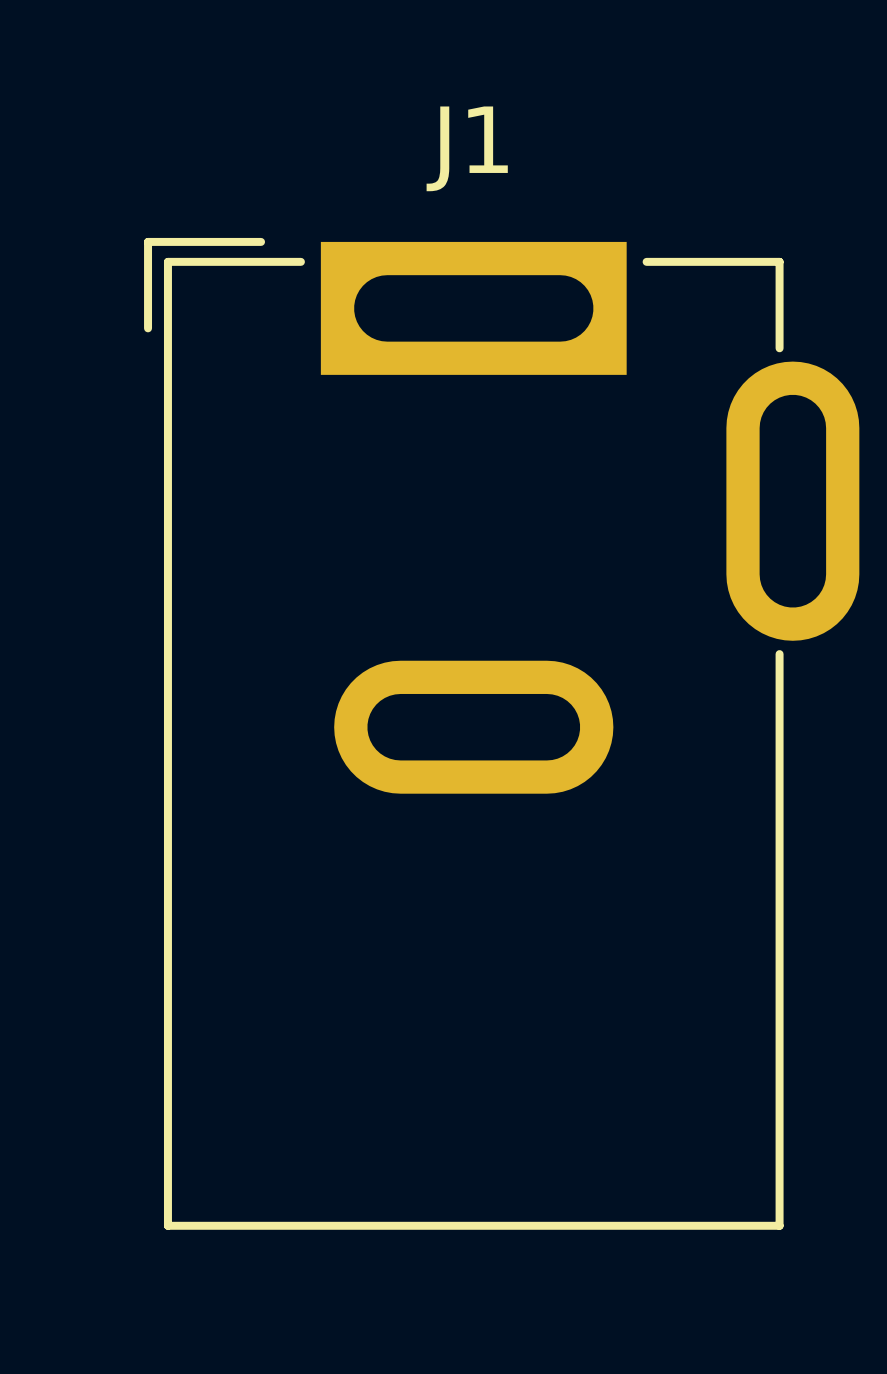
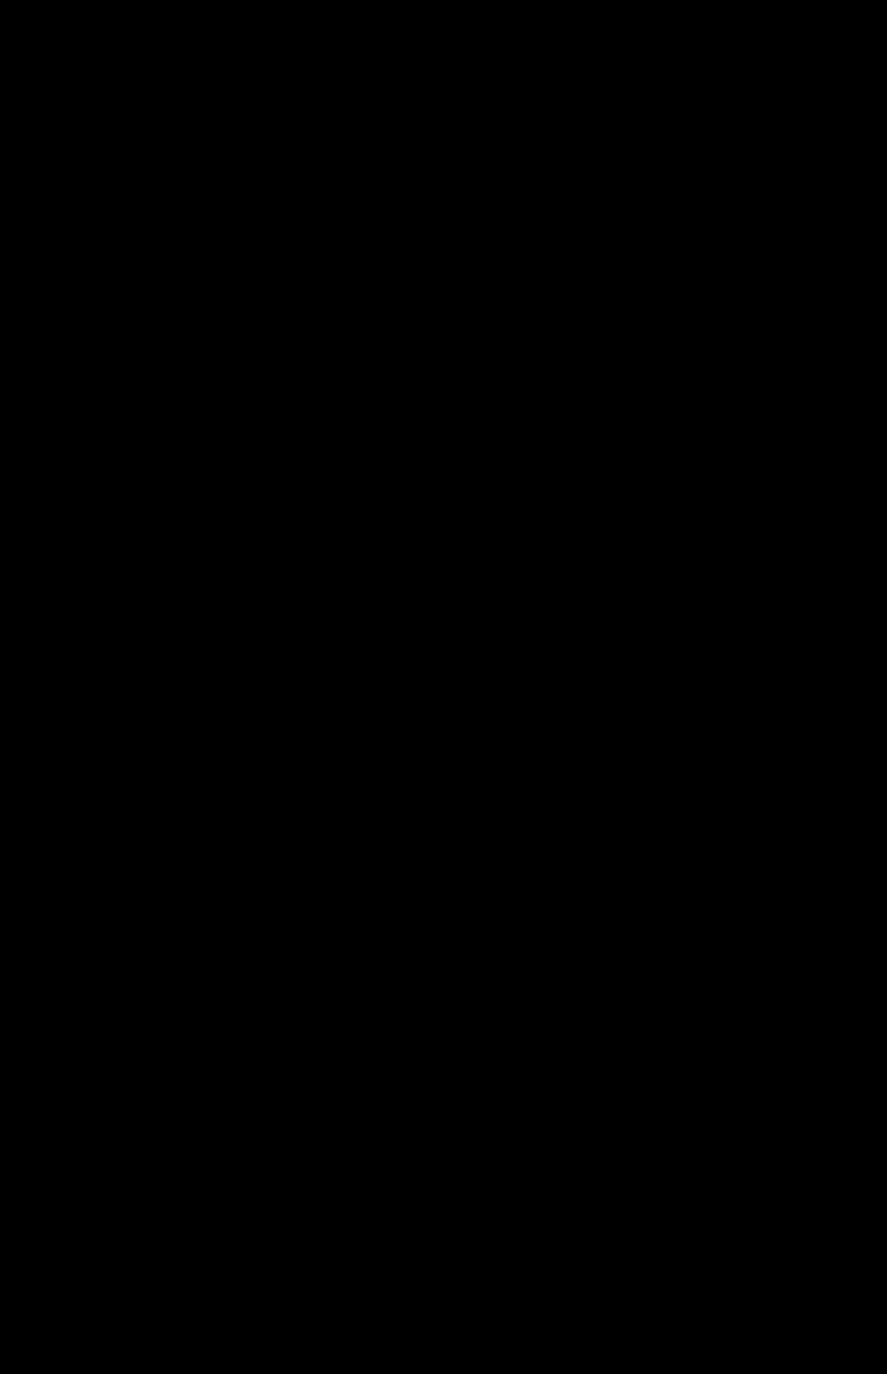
J1: (501, 733) -> none

